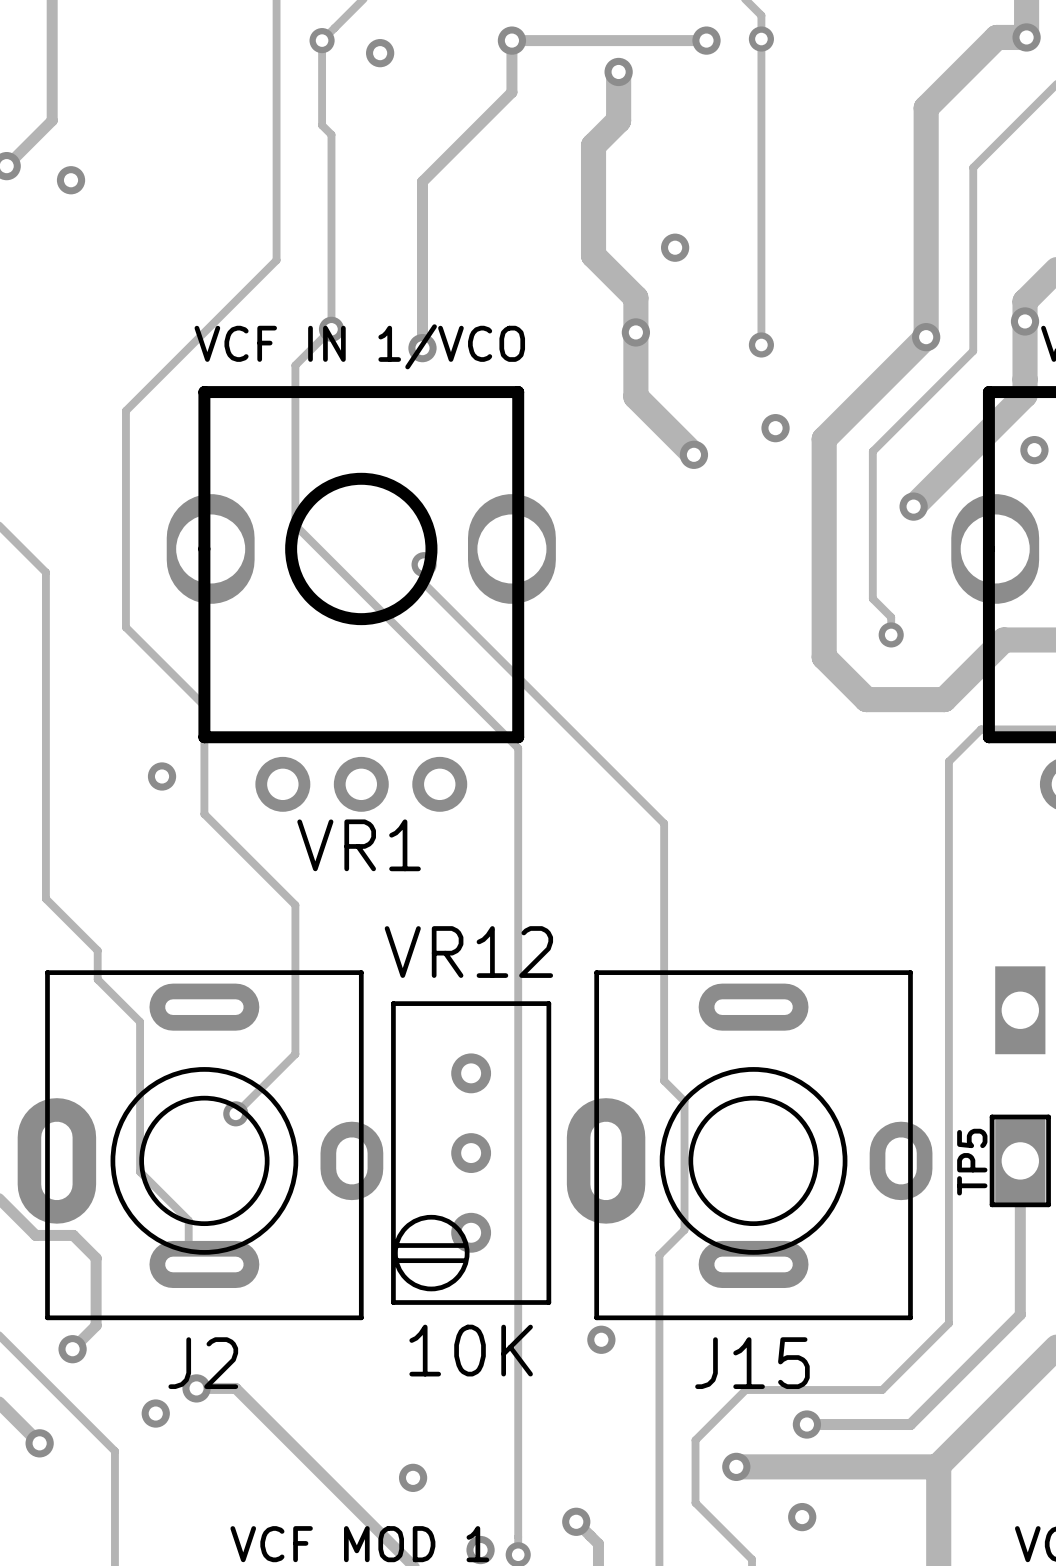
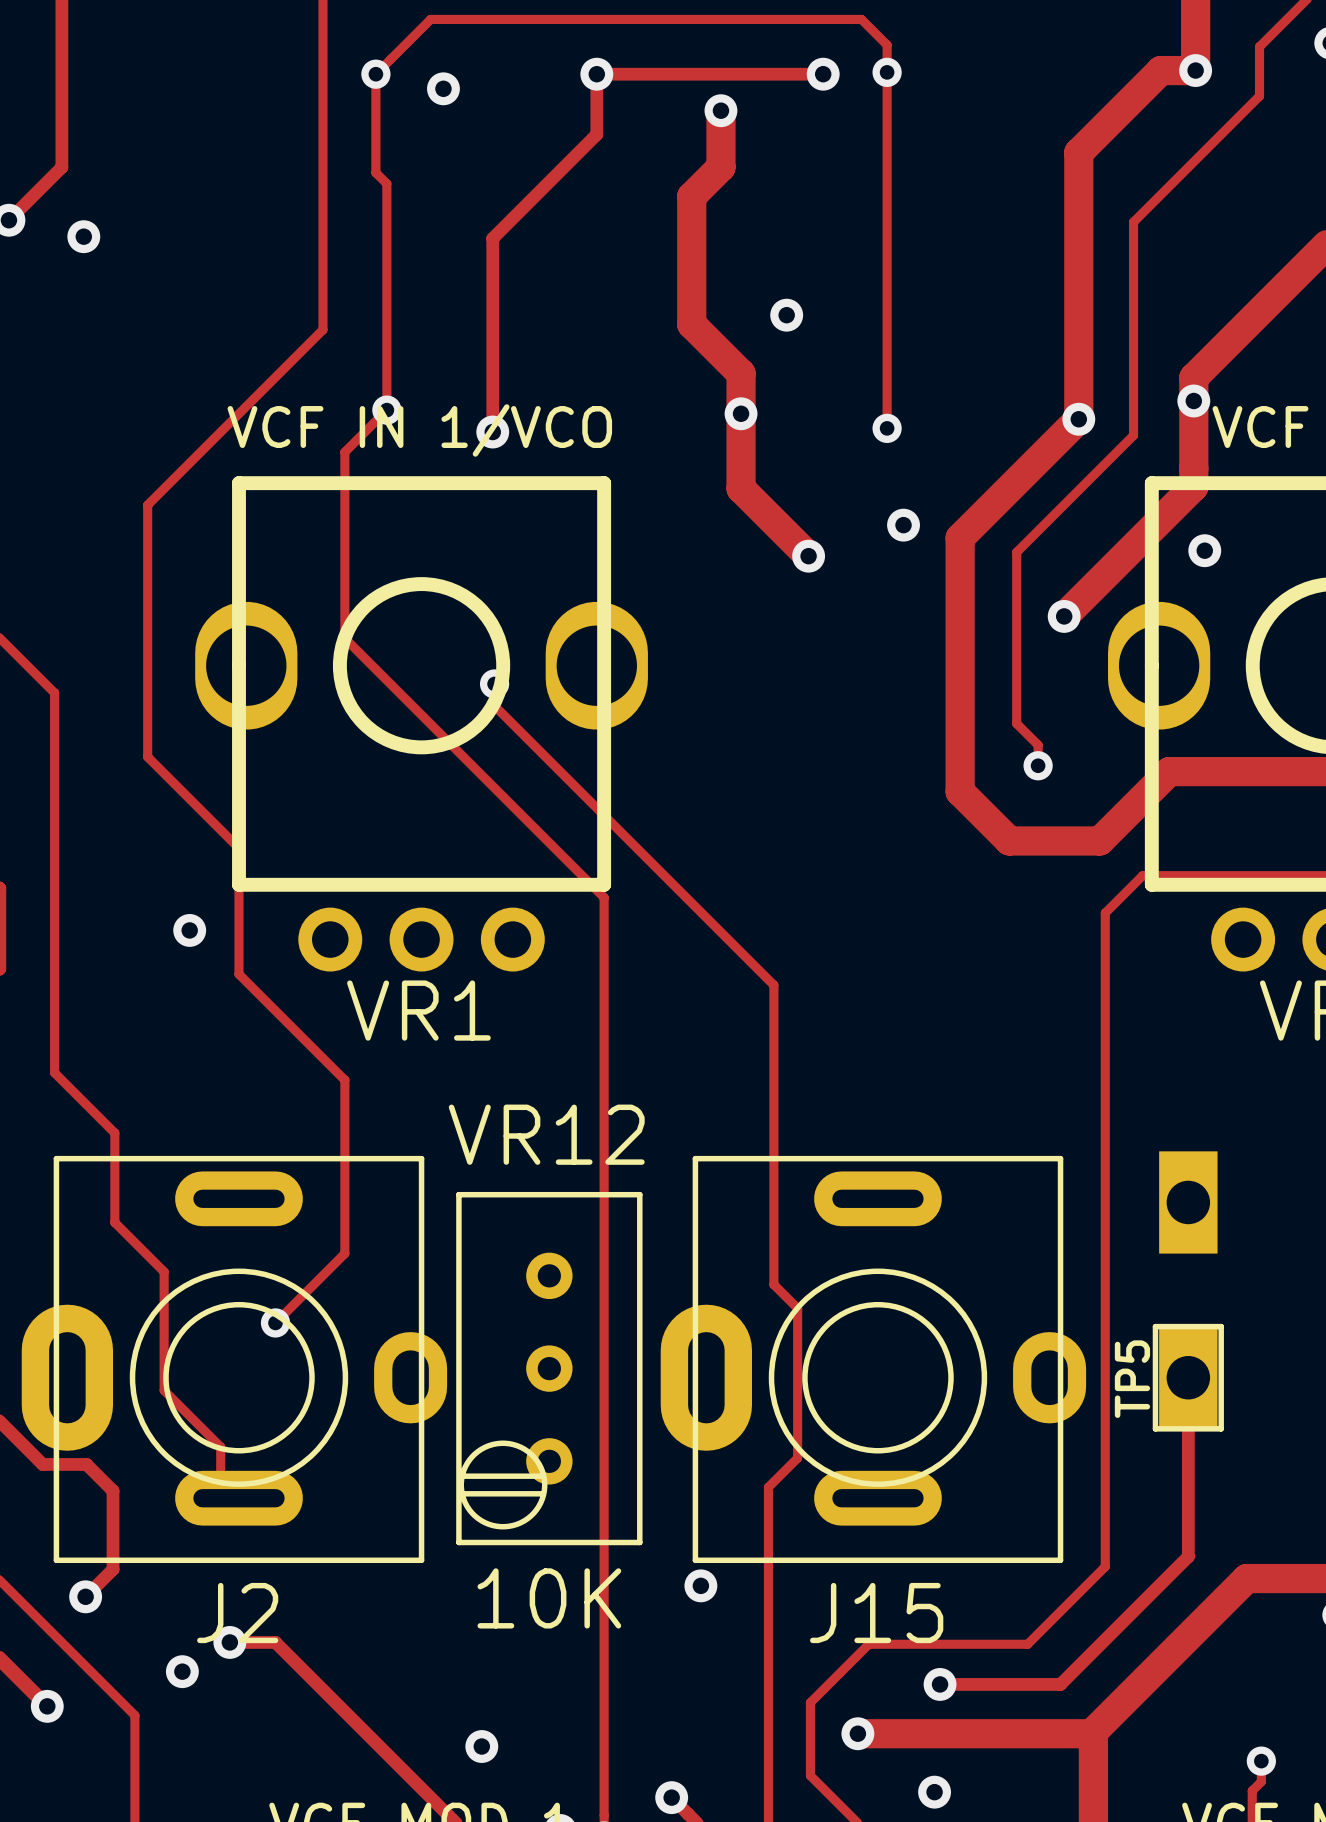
track: (97, 979) (140, 1021) (140, 1069) -> (114, 1166) (114, 1222) (164, 1271)

